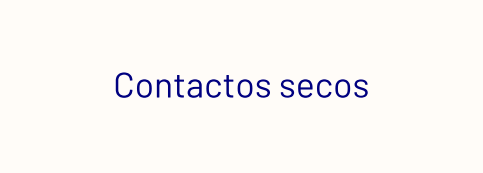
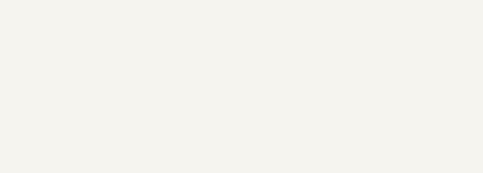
text: Contactos secos (241, 85) -> none

